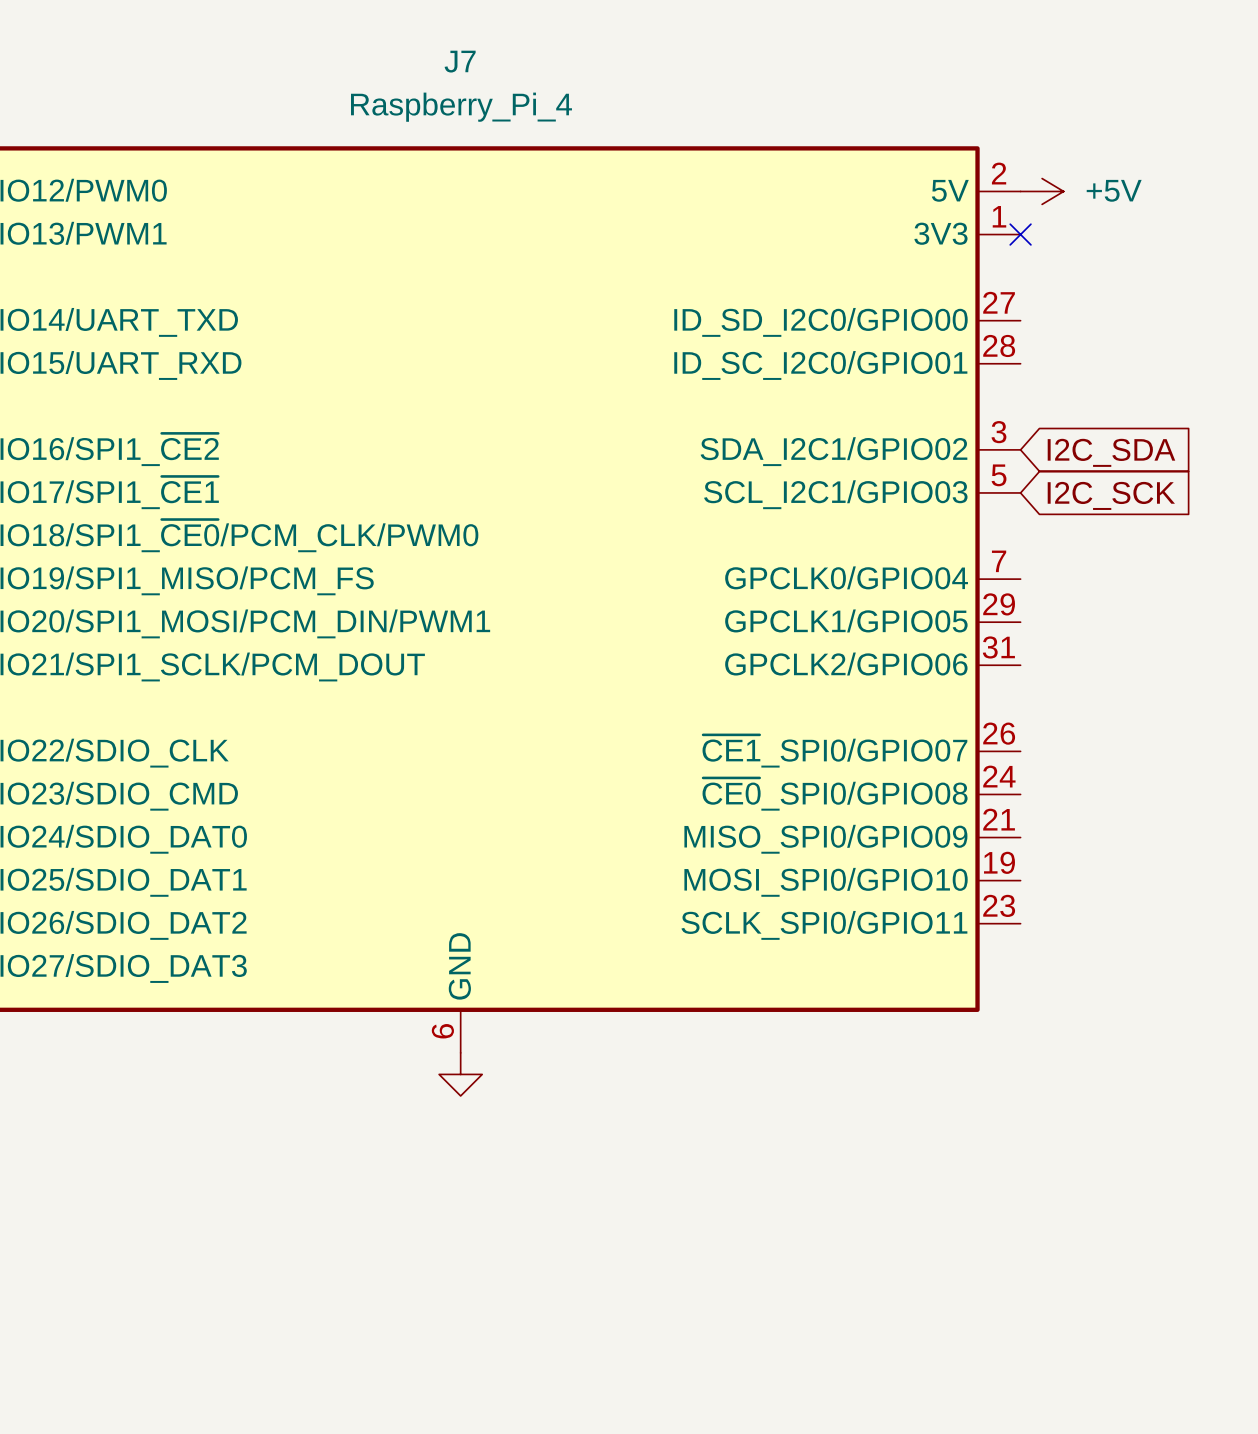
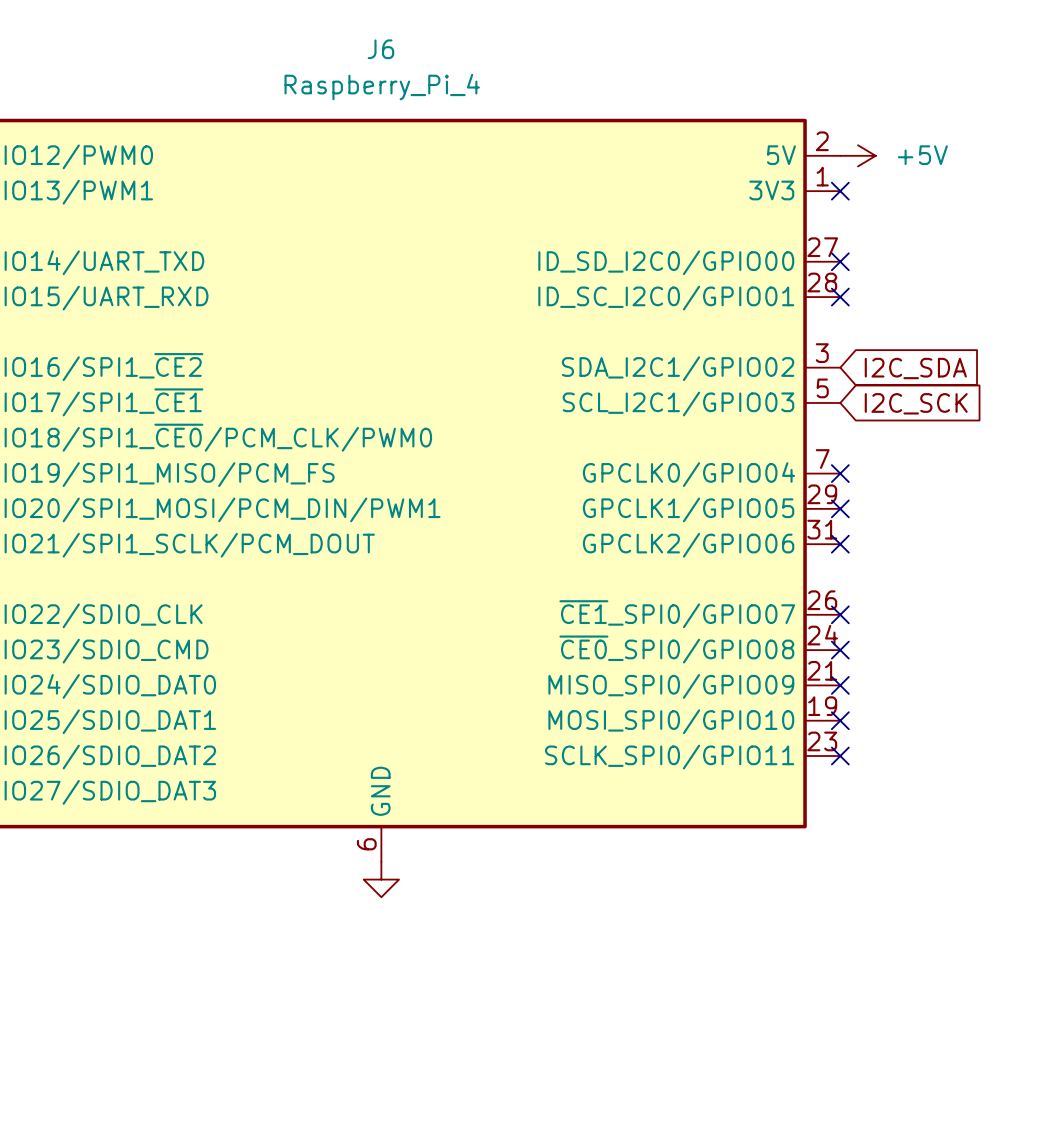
J7 name: J7 (460, 61) -> J6 (380, 49)
no-connect mark: none -> (840, 261)
no-connect mark: none -> (840, 297)
no-connect mark: none -> (840, 473)
no-connect mark: none -> (840, 508)
no-connect mark: none -> (840, 544)
no-connect mark: none -> (840, 614)
no-connect mark: none -> (840, 650)
no-connect mark: none -> (840, 685)
no-connect mark: none -> (840, 720)
no-connect mark: none -> (840, 756)

